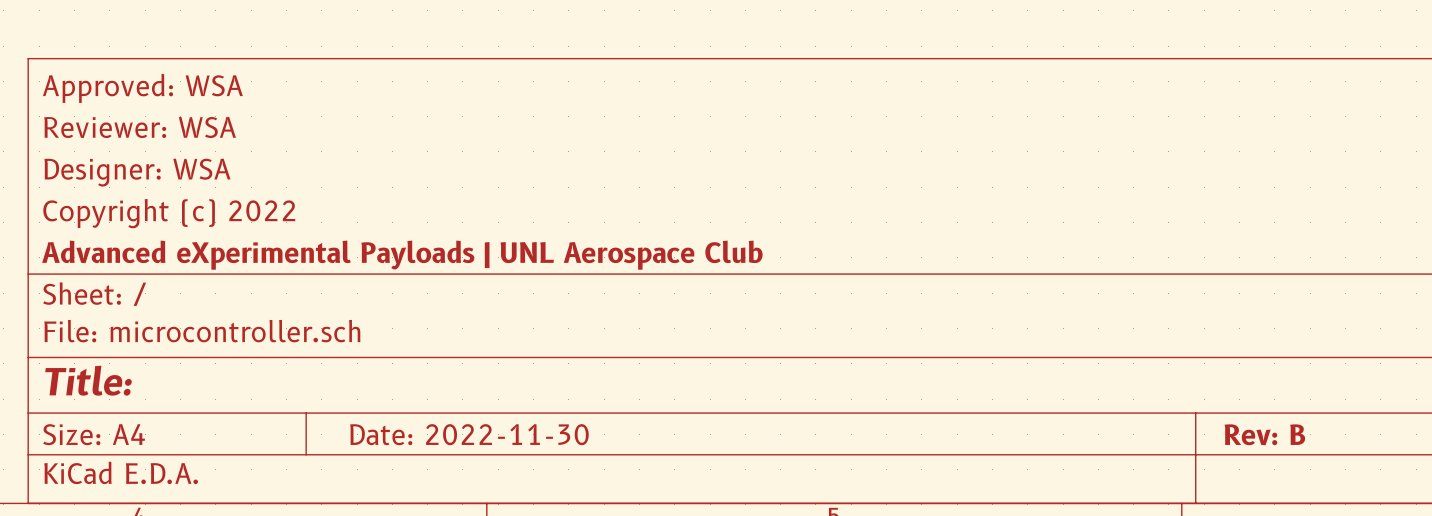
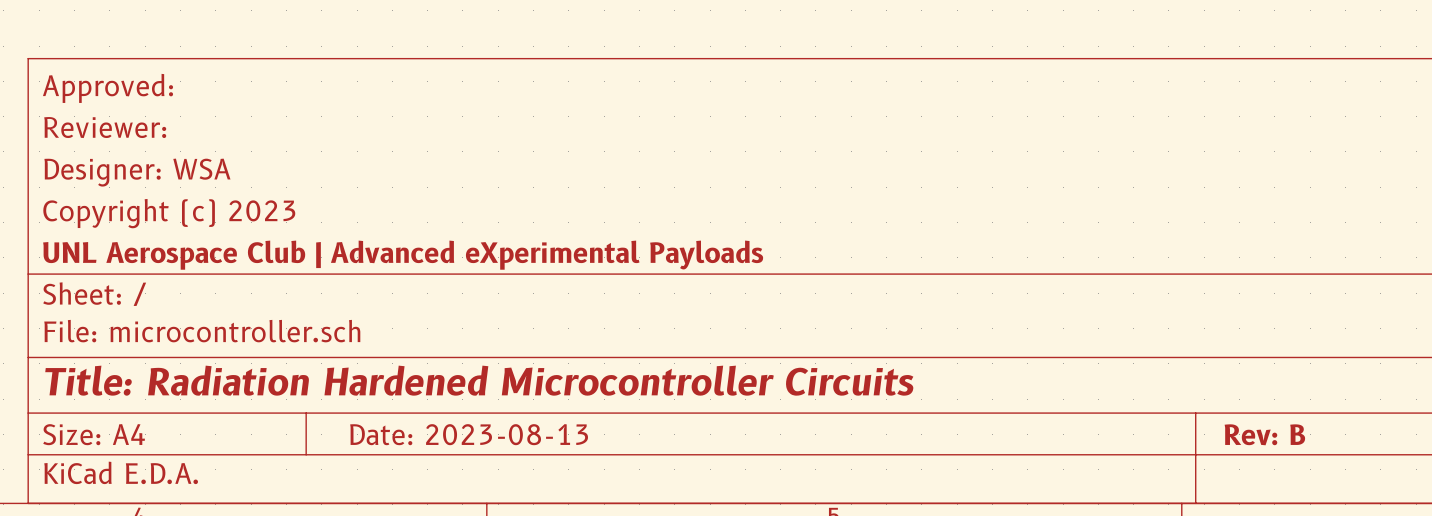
title block: Approved: WSA (142, 88) -> Approved: (107, 88)
title block: Reviewer: WSA (140, 127) -> Reviewer: (105, 127)
title block: Copyright (c) 2022 (169, 213) -> Copyright (c) 2023 (169, 213)
title block: Advanced eXperimental Payloads | UNL Aerospace Club (402, 255) -> UNL Aerospace Club | Advanced eXperimental Payloads (403, 255)
title block: Title: (88, 380) -> Title: Radiation Hardened Microcontroller Circuits (479, 380)
title block: Date: 2022-11-30 (469, 434) -> Date: 2023-08-13 (469, 434)

